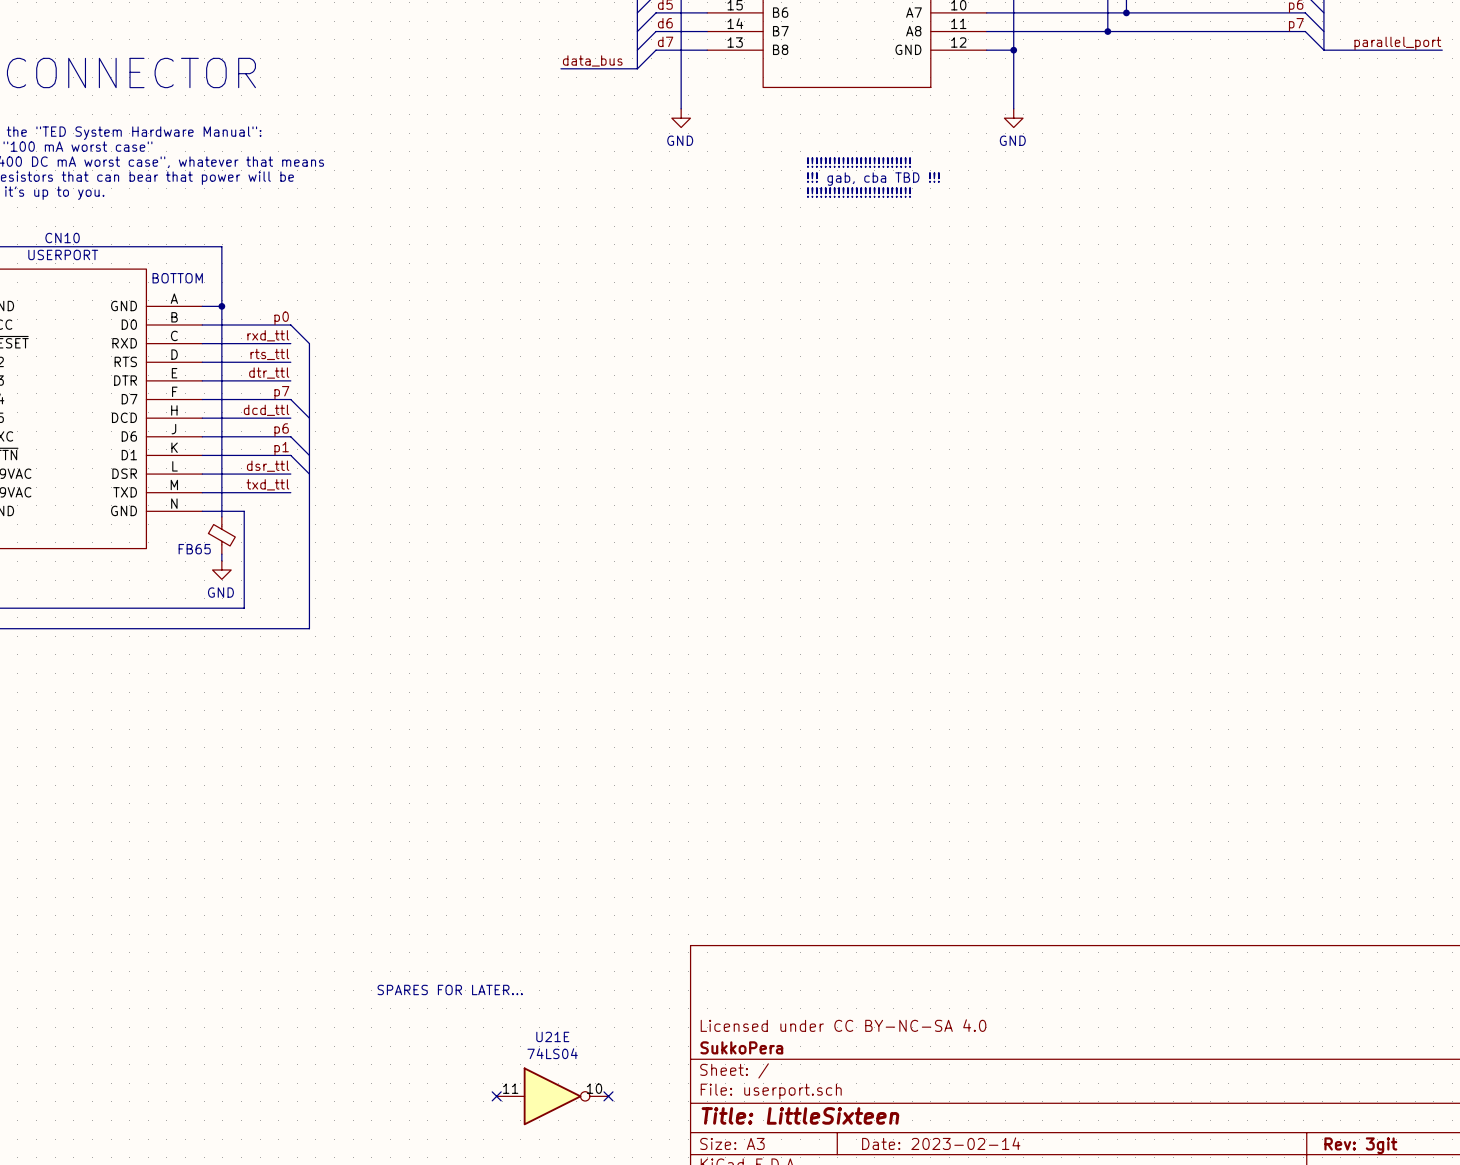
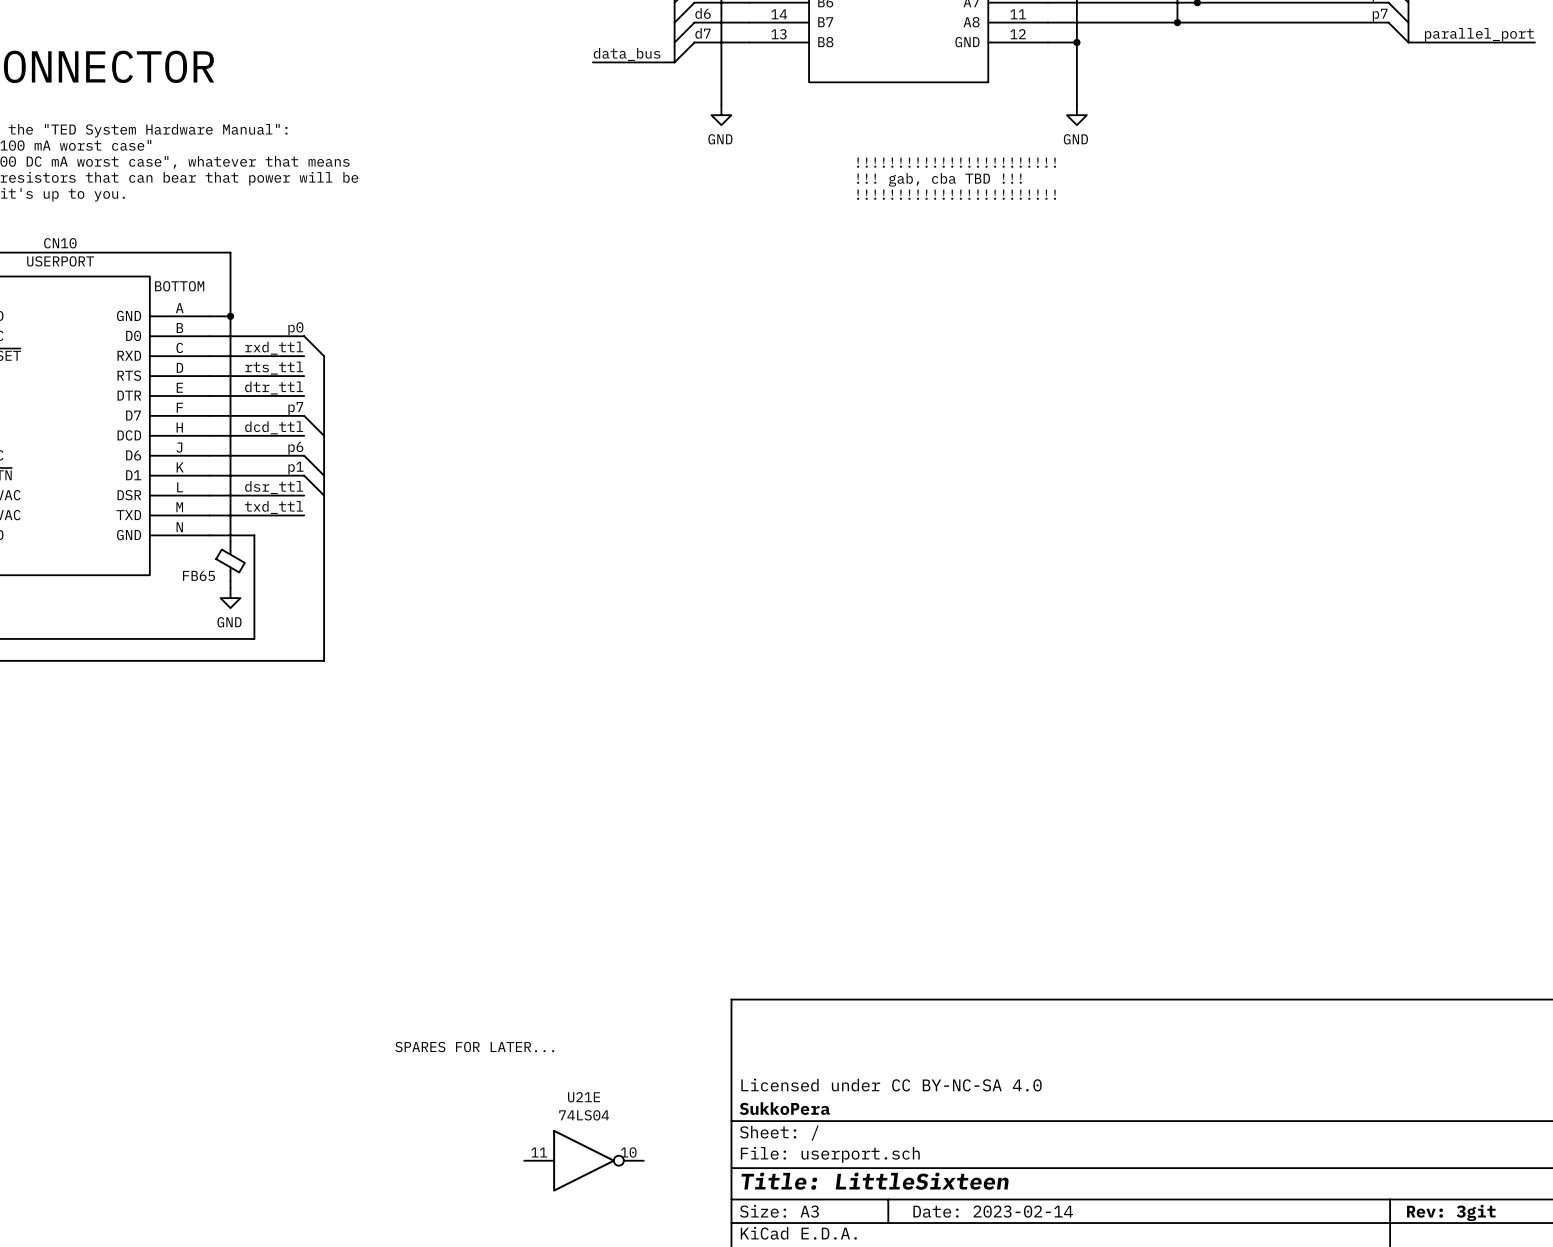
no-connect mark: (496, 1096) -> none
no-connect mark: (608, 1096) -> none

